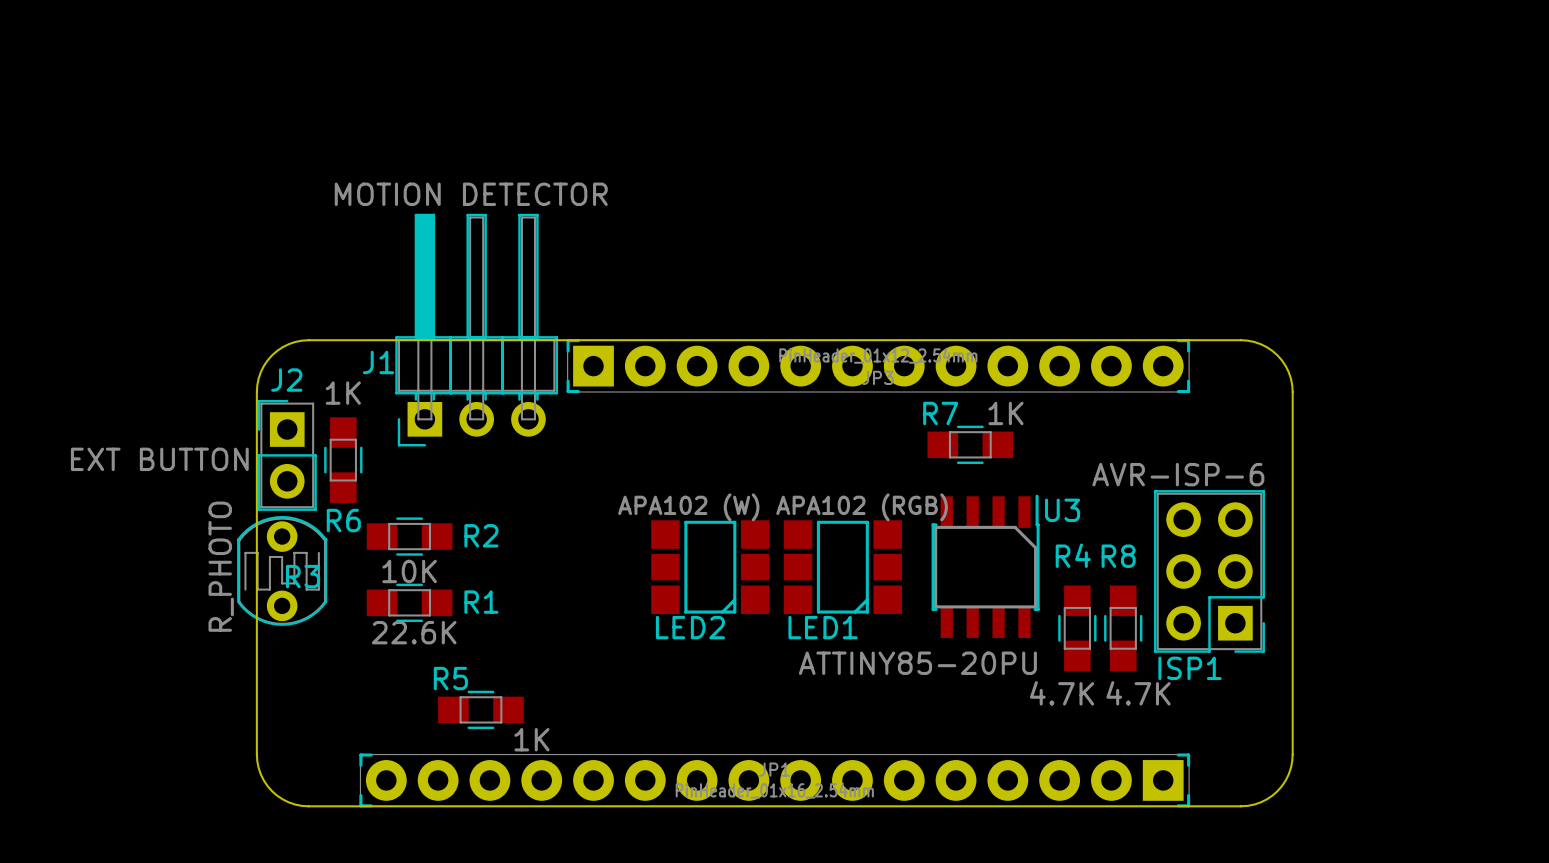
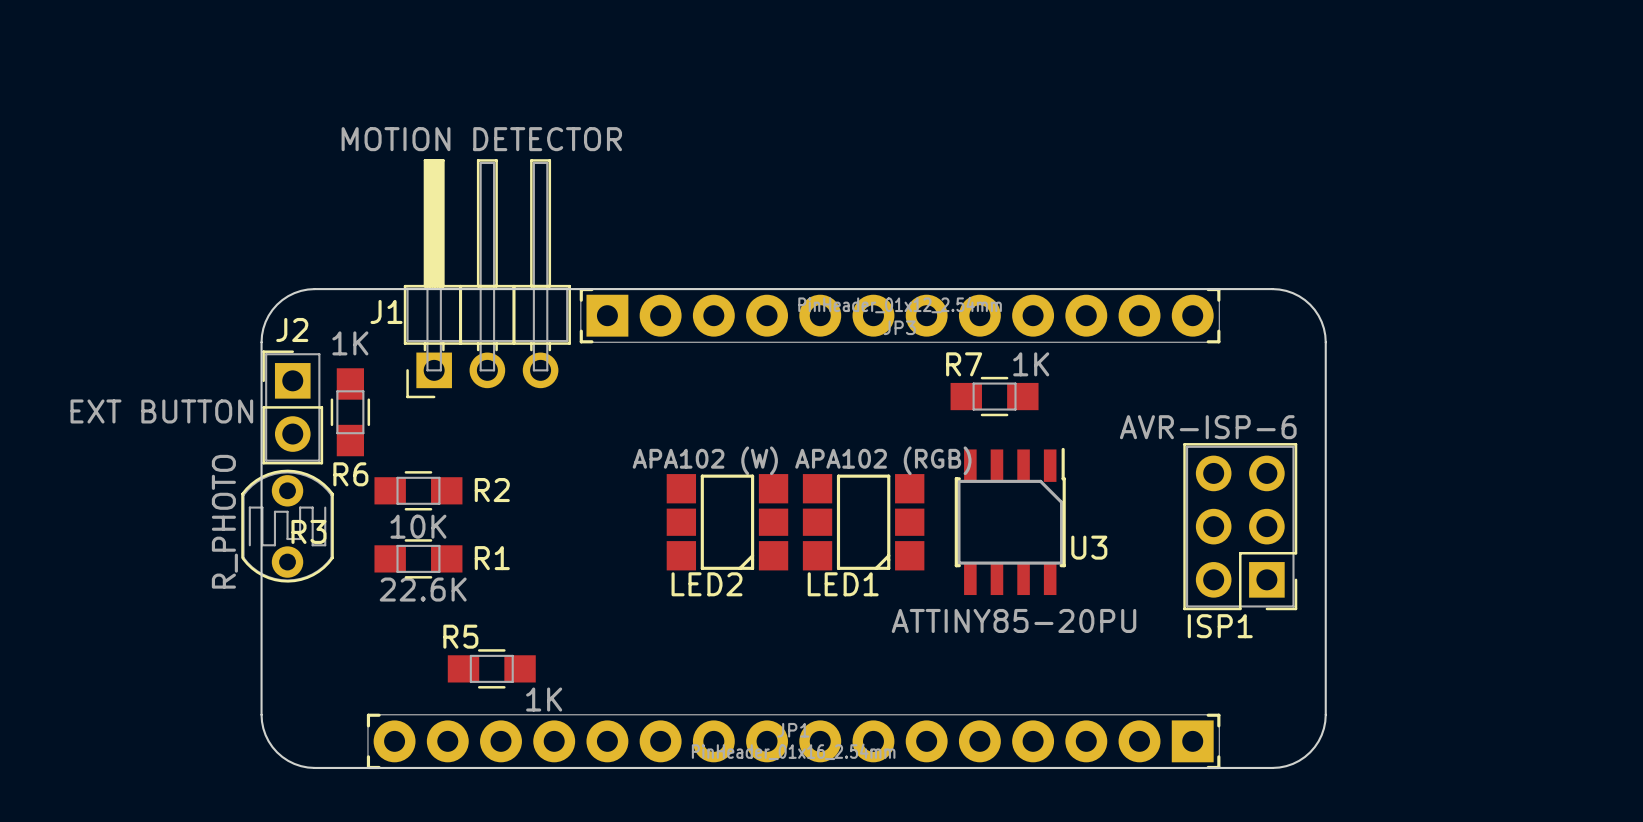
U3 name position: U3 (1062, 510) -> U3 (1089, 547)
R4: 4.7K (1077, 628) -> none
R8: 4.7K (1123, 628) -> none
U3 value position: ATTINY85-20PU (917, 663) -> ATTINY85-20PU (1014, 620)

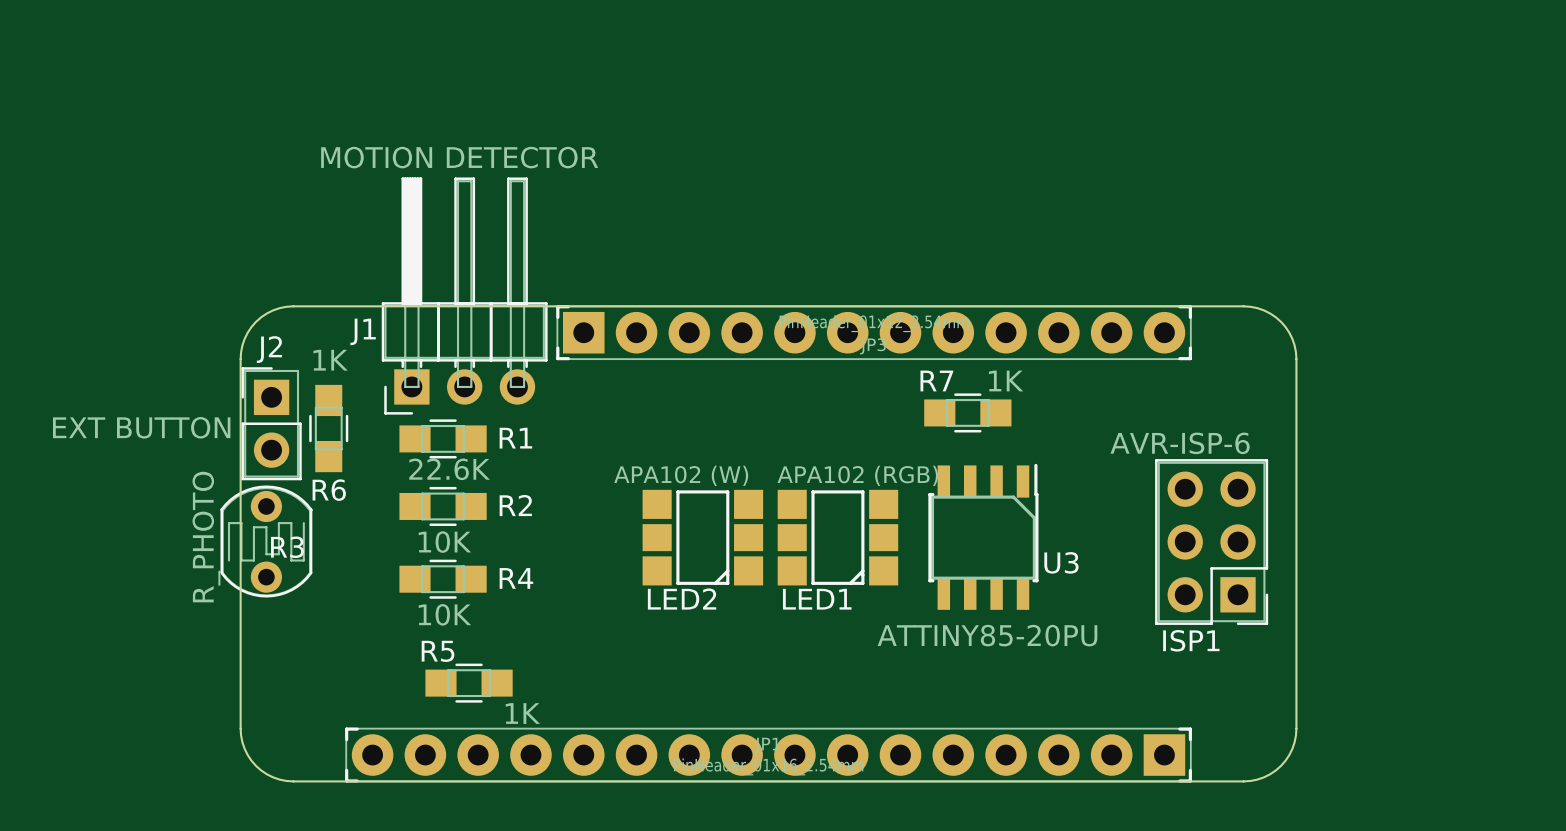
R2 position: (418, 490) -> (443, 506)
R1 position: (418, 558) -> (443, 438)
R4: none -> 10K (443, 579)

